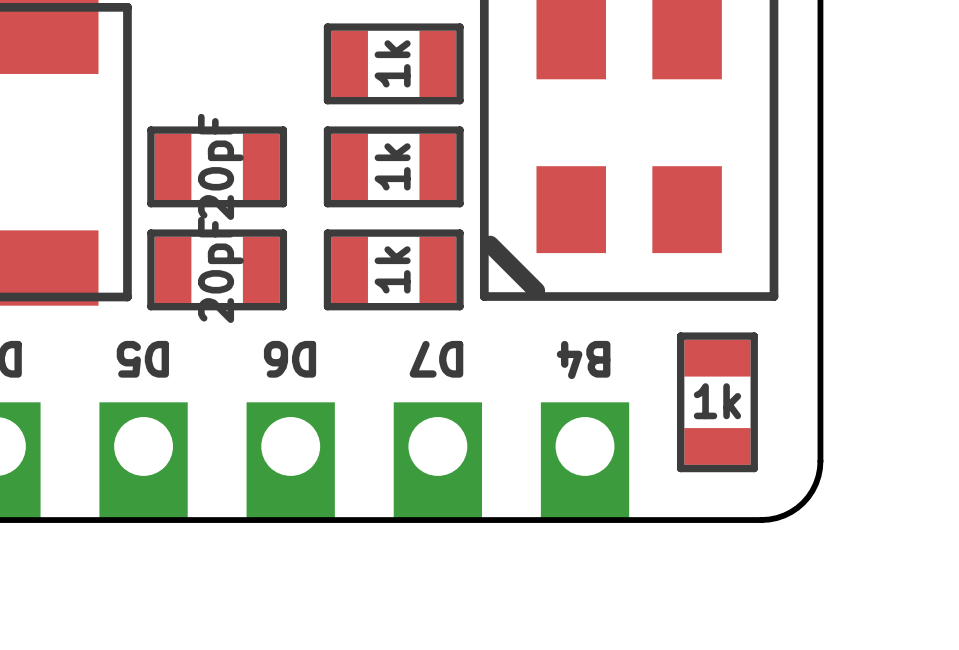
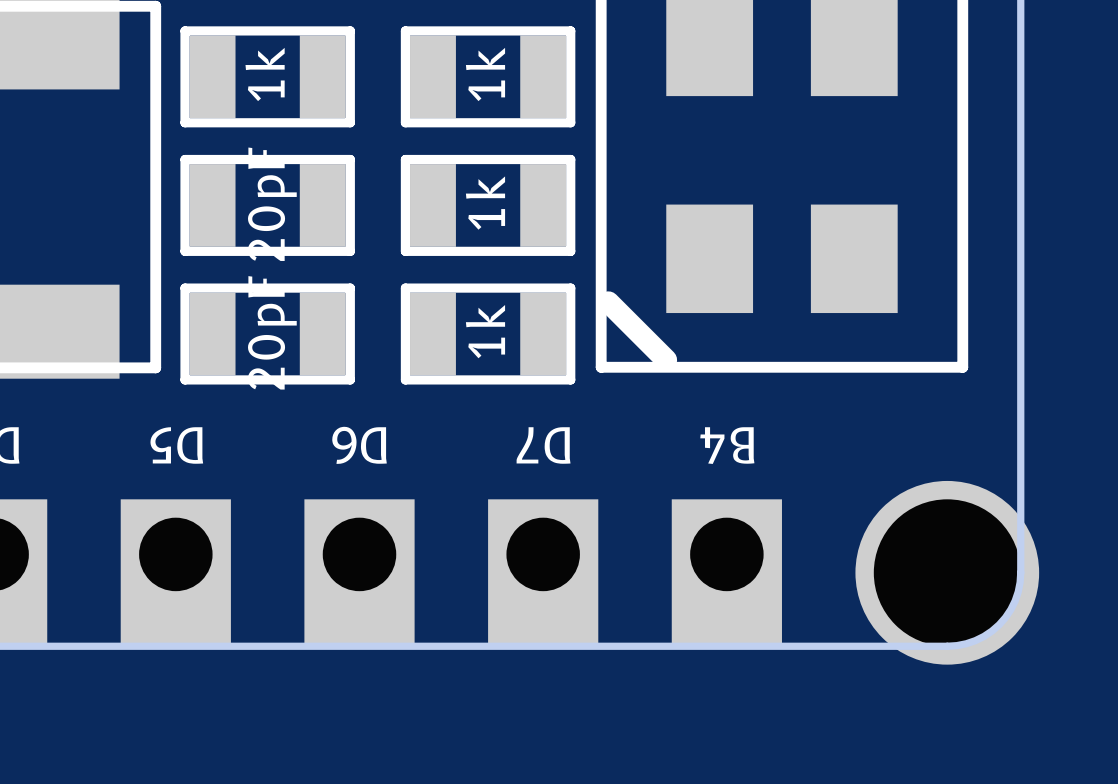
part rotation: 0° (717, 402) -> 90° clockwise (267, 76)
part position: (717, 402) -> (267, 76)
part: none -> (947, 572)

